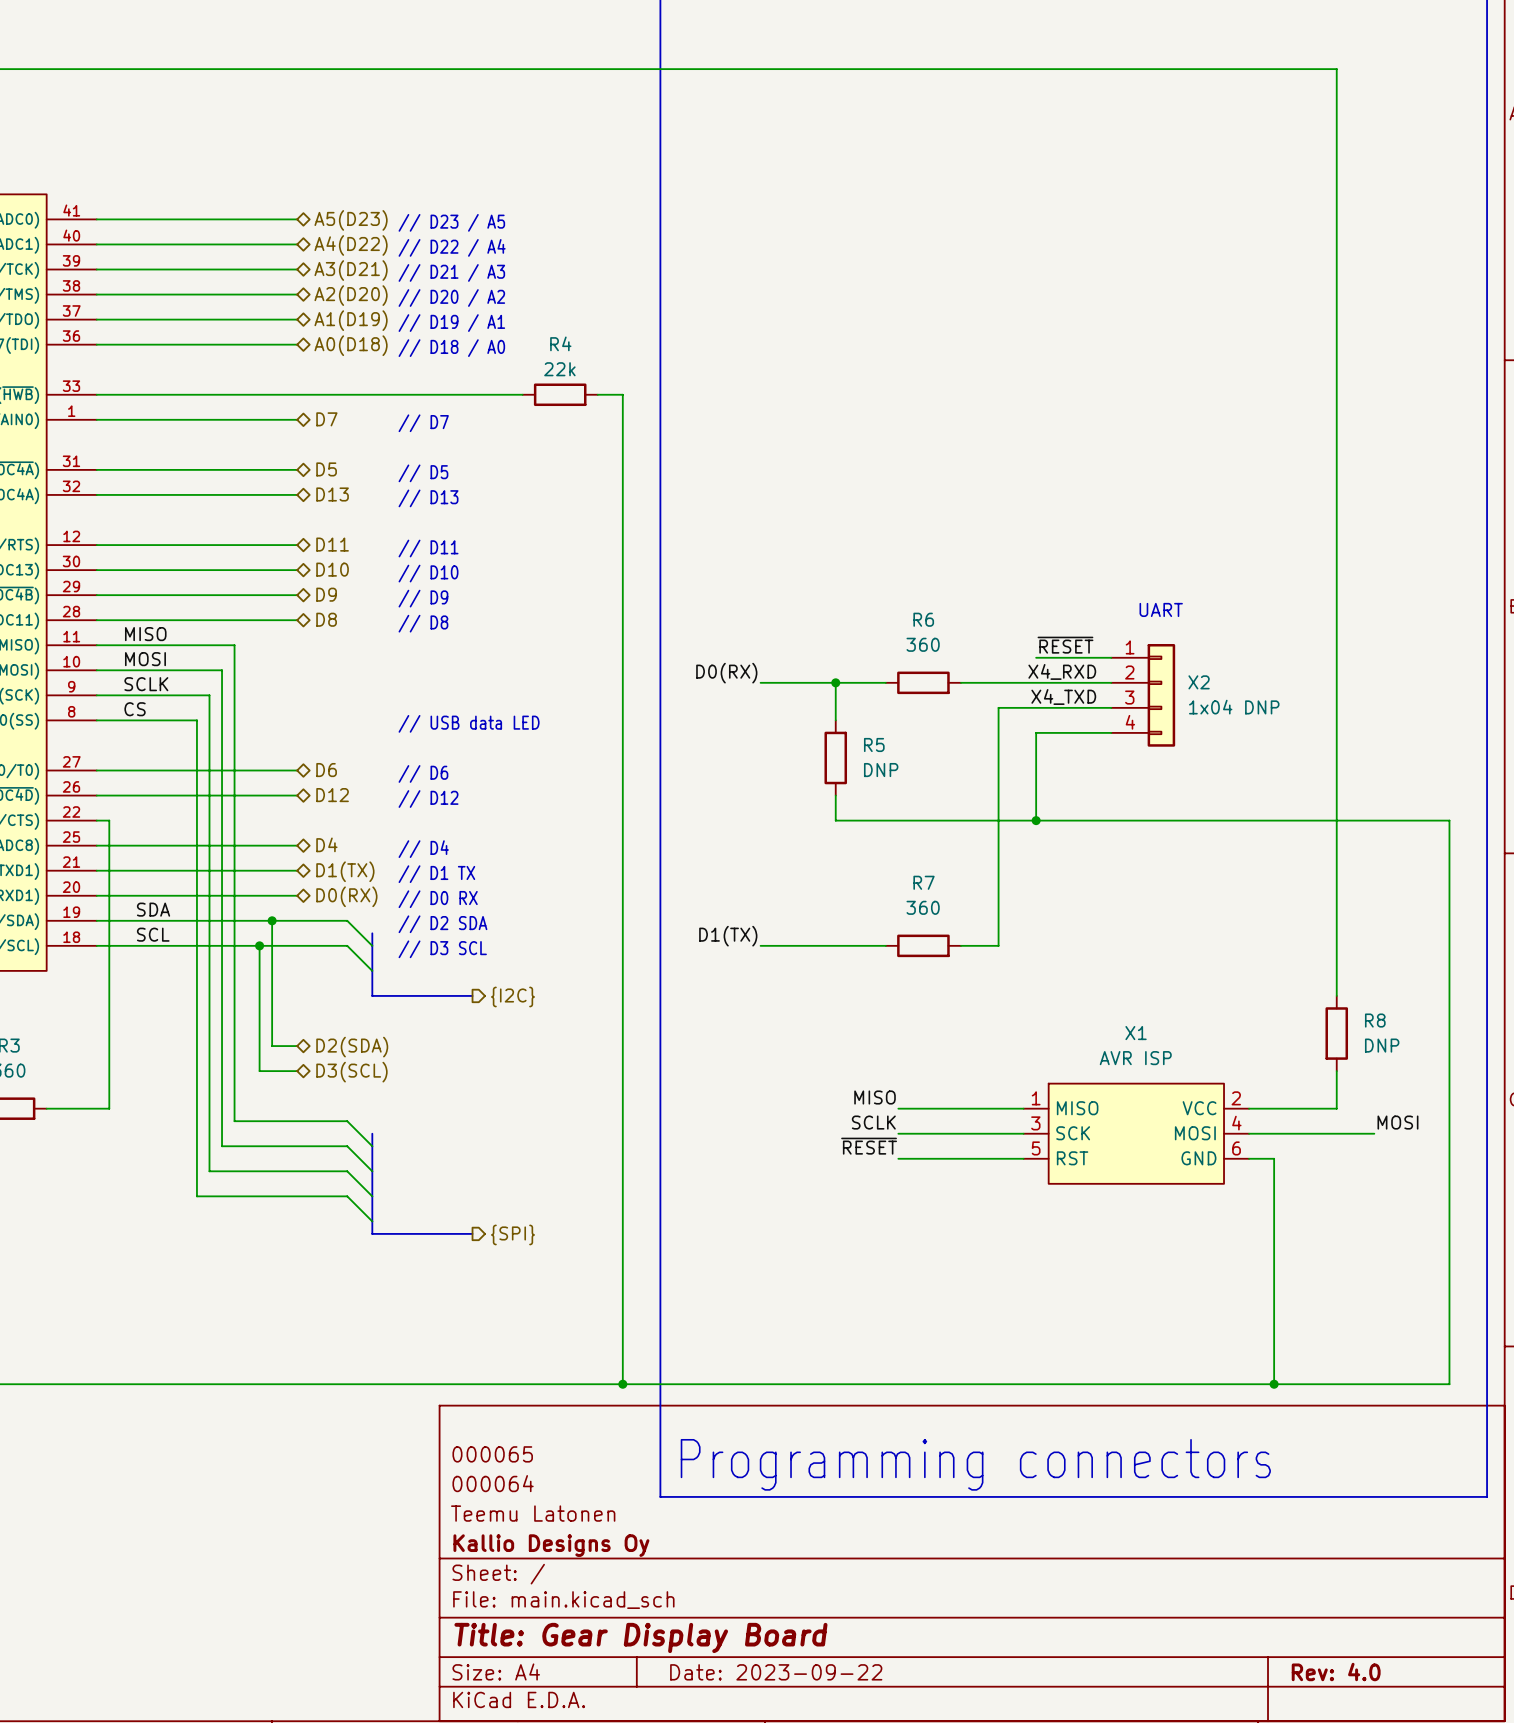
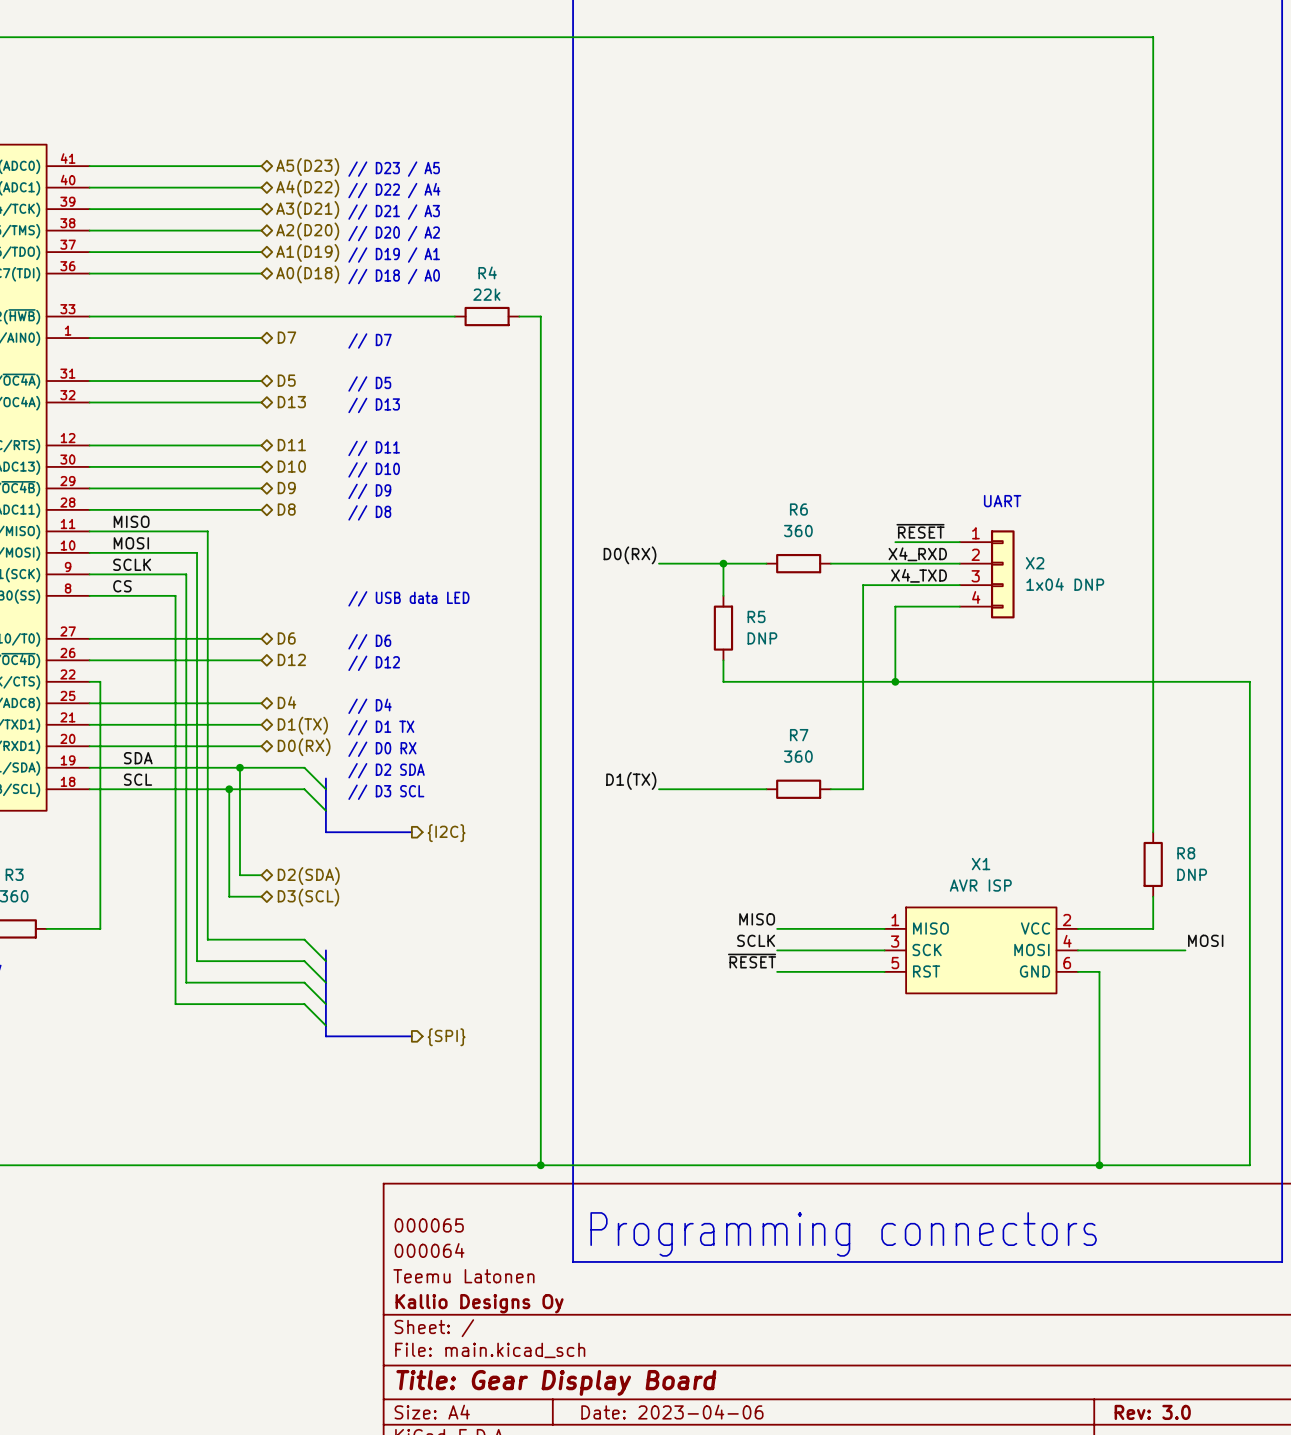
title block: Rev: 4.0 (1336, 1671) -> Rev: 3.0 (1152, 1412)
title block: Date: 2023-09-22 (776, 1672) -> Date: 2023-04-06 (672, 1412)

